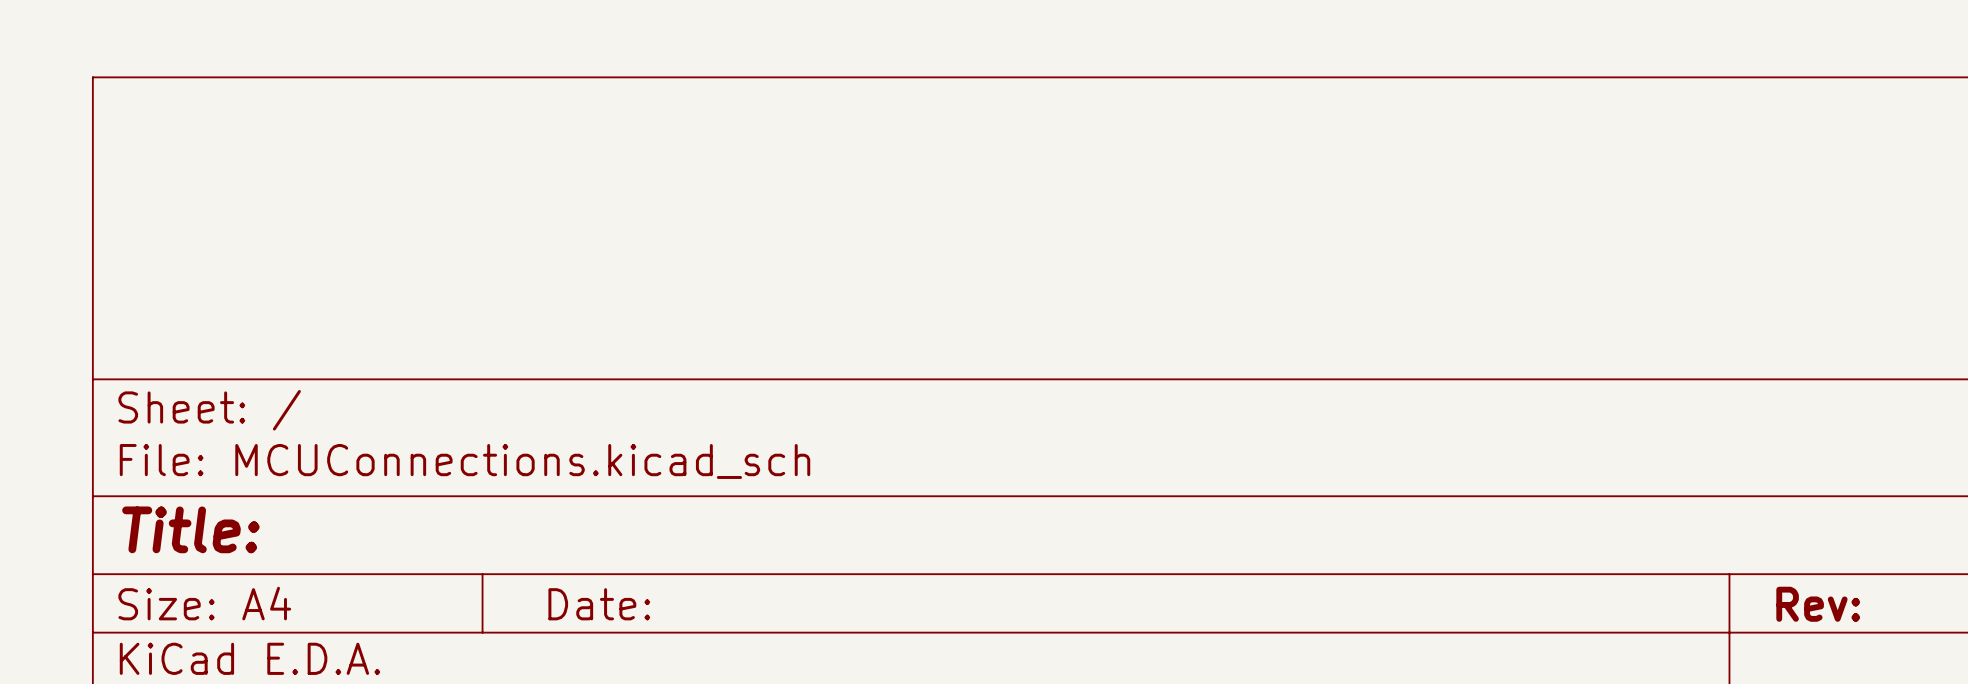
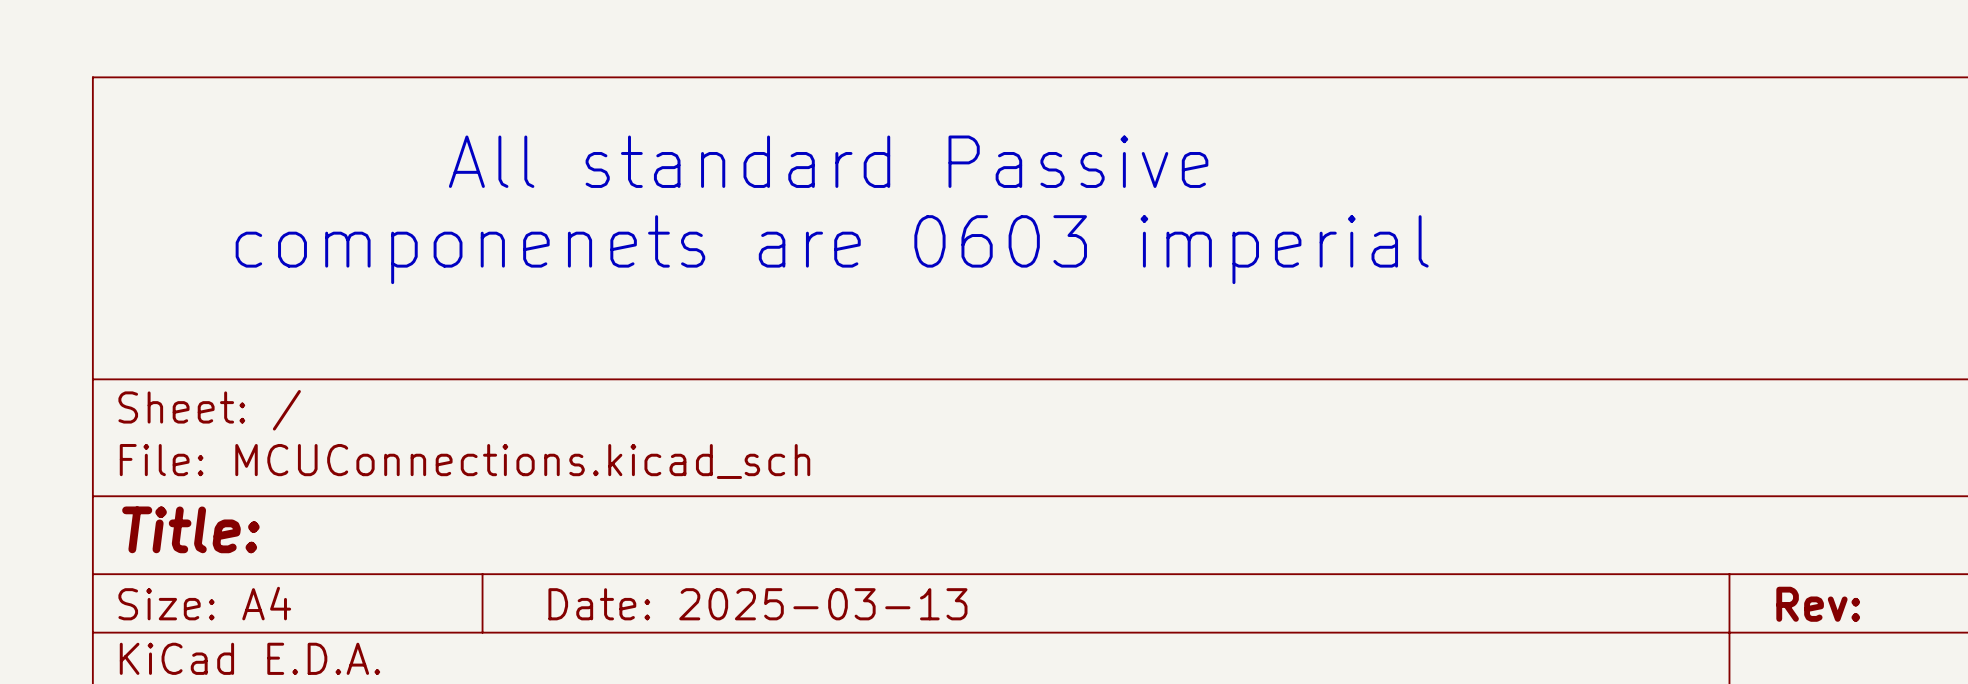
text: none -> All standard Passive (828, 161)
text: none -> componenets are 0603 imperial (832, 249)
title block: Date: (599, 604) -> Date: 2025-03-13 (757, 604)

